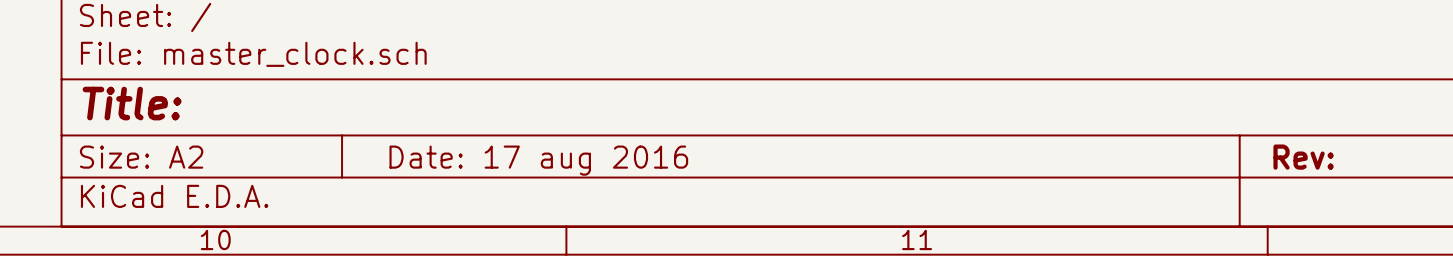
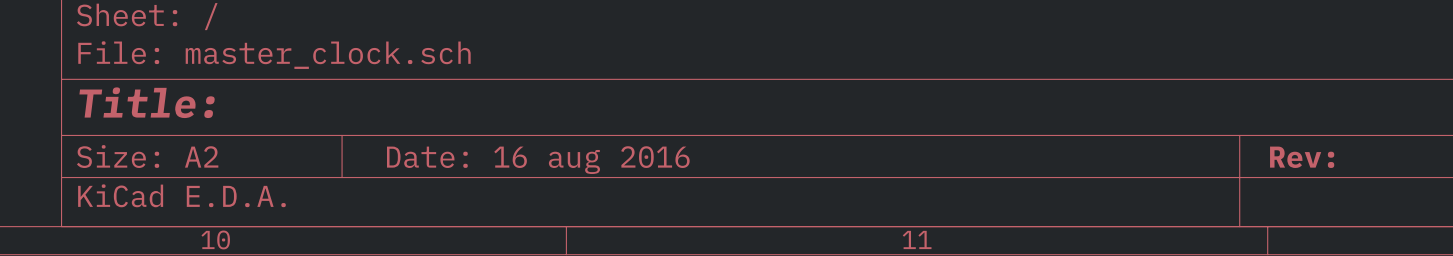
title block: Date: 17 aug 2016 (538, 160) -> Date: 16 aug 2016 (538, 160)

